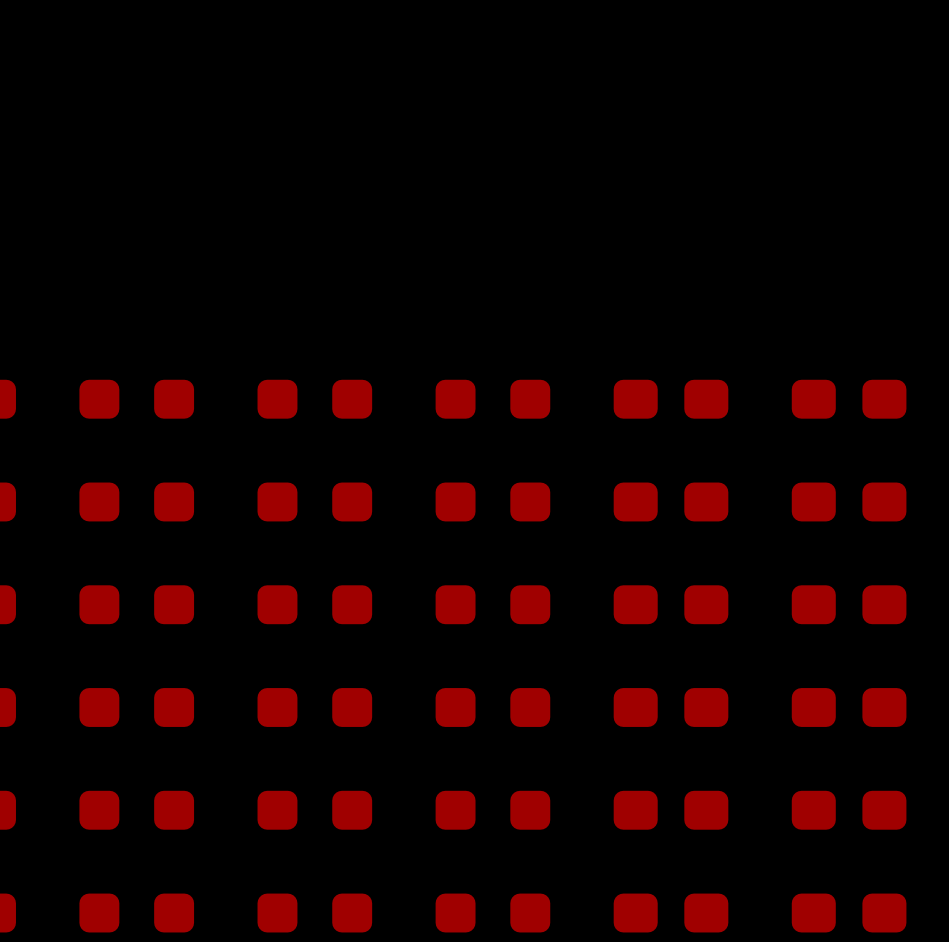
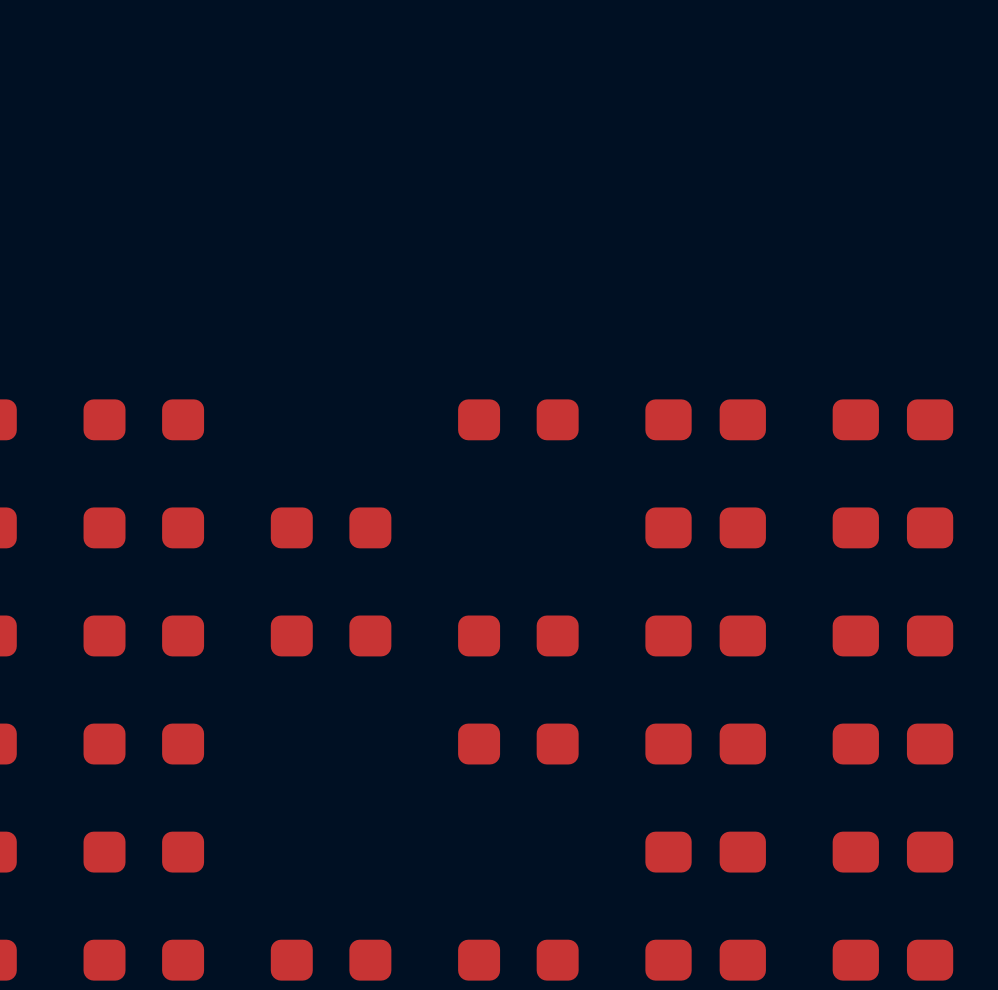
part: (314, 399) -> none
part: (492, 501) -> none
part: (314, 707) -> none
part: (314, 810) -> none
part: (492, 810) -> none

